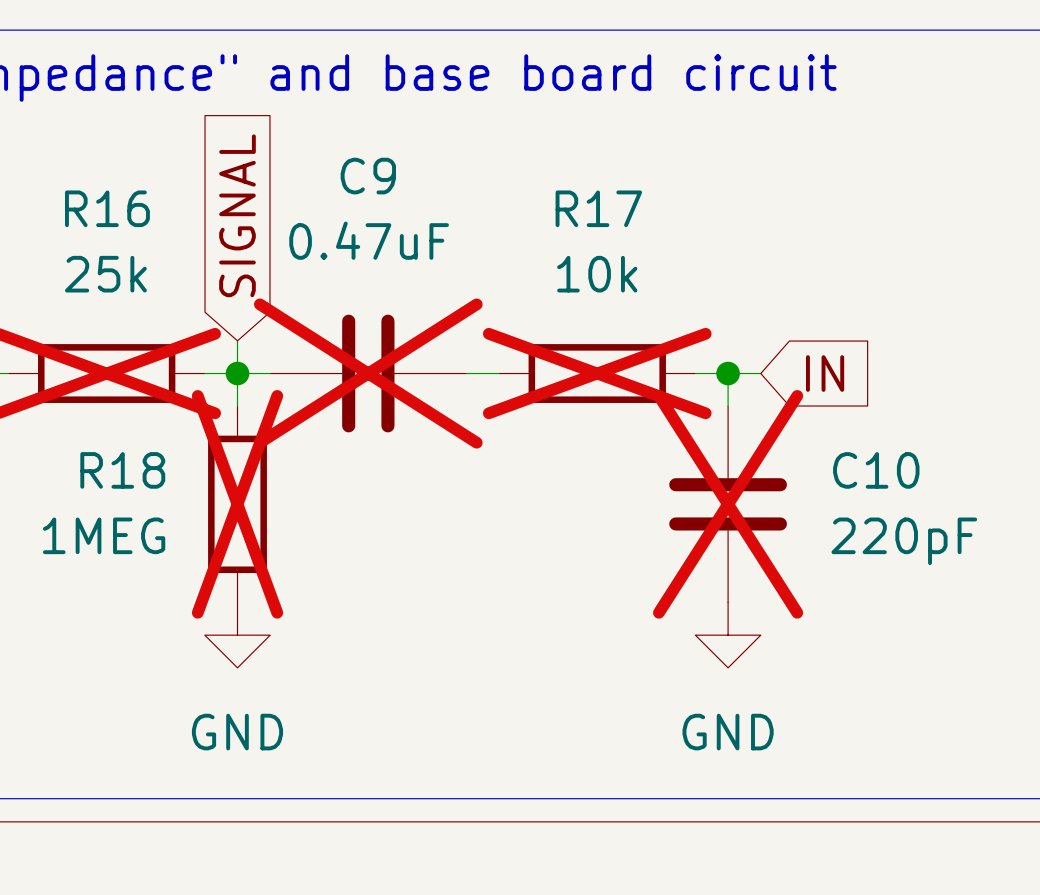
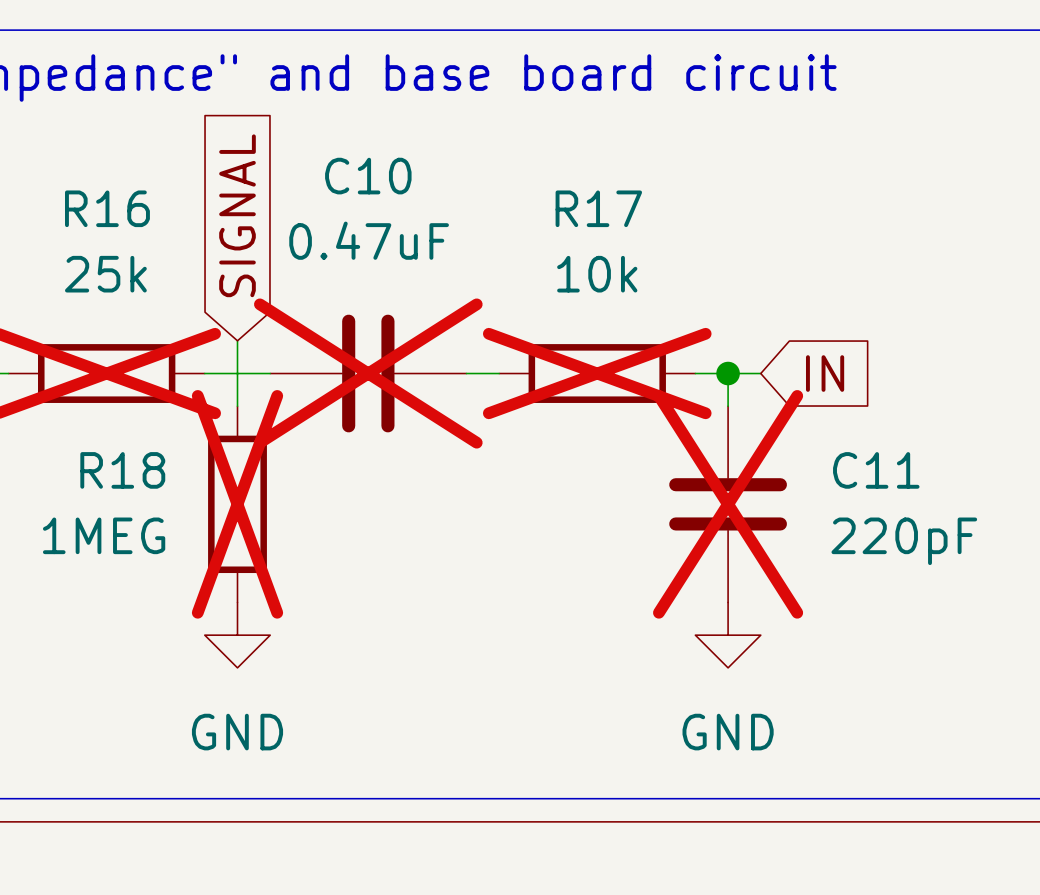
C9 name: C9 (368, 176) -> C10 (368, 176)
junction: (237, 373) -> none
C10 name: C10 (876, 470) -> C11 (876, 470)

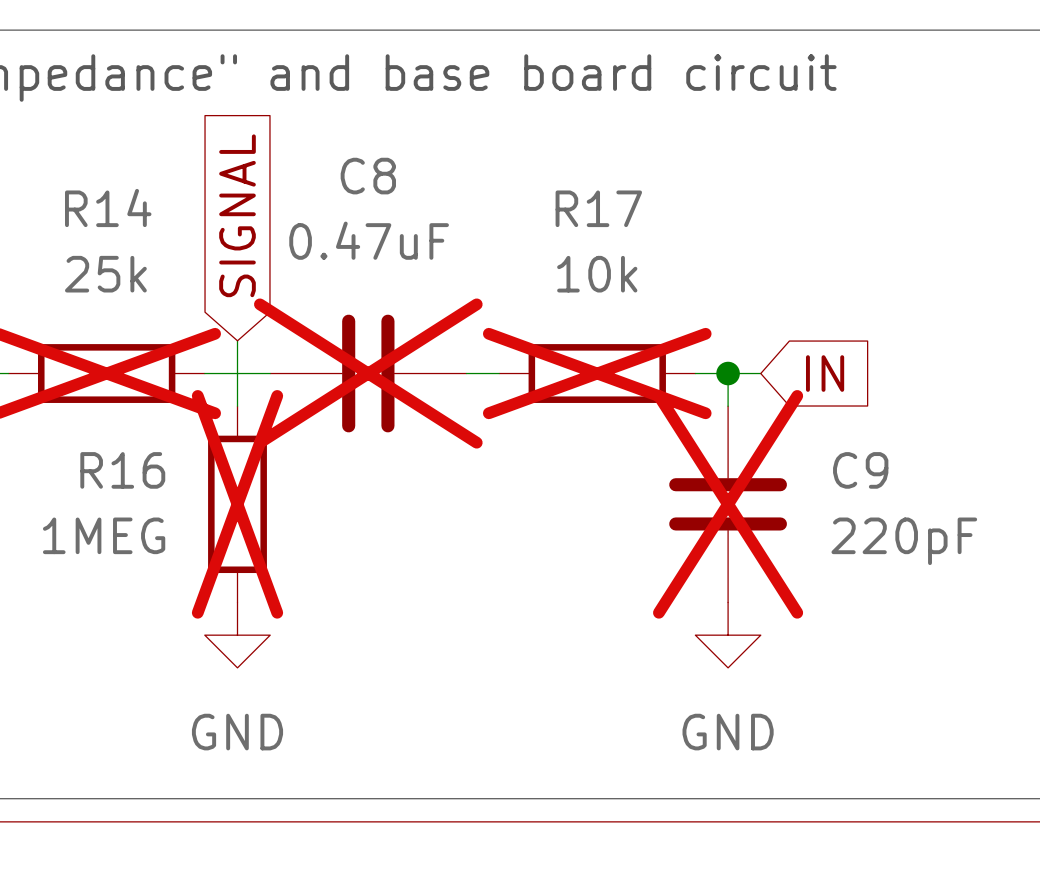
C10 name: C10 (368, 176) -> C8 (368, 176)
R16 name: R16 (107, 208) -> R14 (108, 208)
R18 name: R18 (122, 470) -> R16 (122, 470)
C11 name: C11 (876, 470) -> C9 (860, 470)

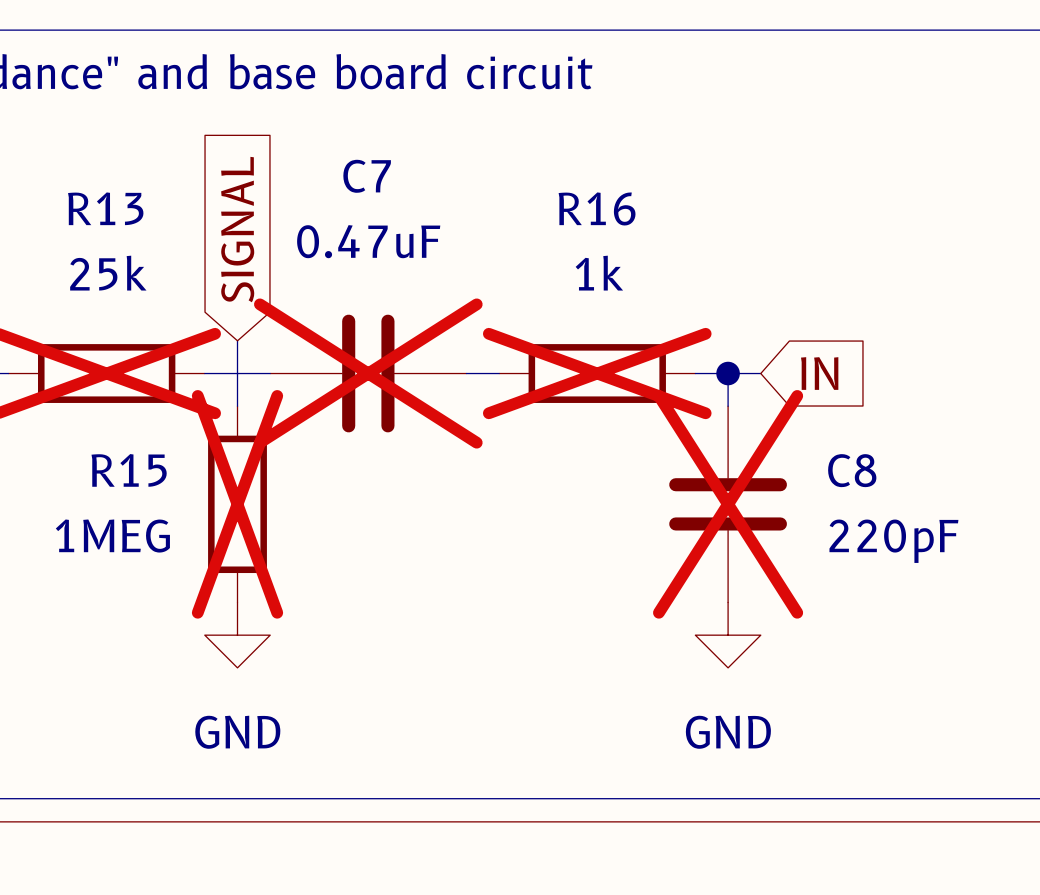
C8 name: C8 (368, 176) -> C7 (367, 176)
R14 name: R14 (108, 208) -> R13 (105, 208)
R17 name: R17 (598, 208) -> R16 (597, 208)
R17 value: 10k (597, 274) -> 1k (599, 273)
R16 name: R16 (122, 470) -> R15 (129, 470)
C9 name: C9 (860, 470) -> C8 (852, 470)

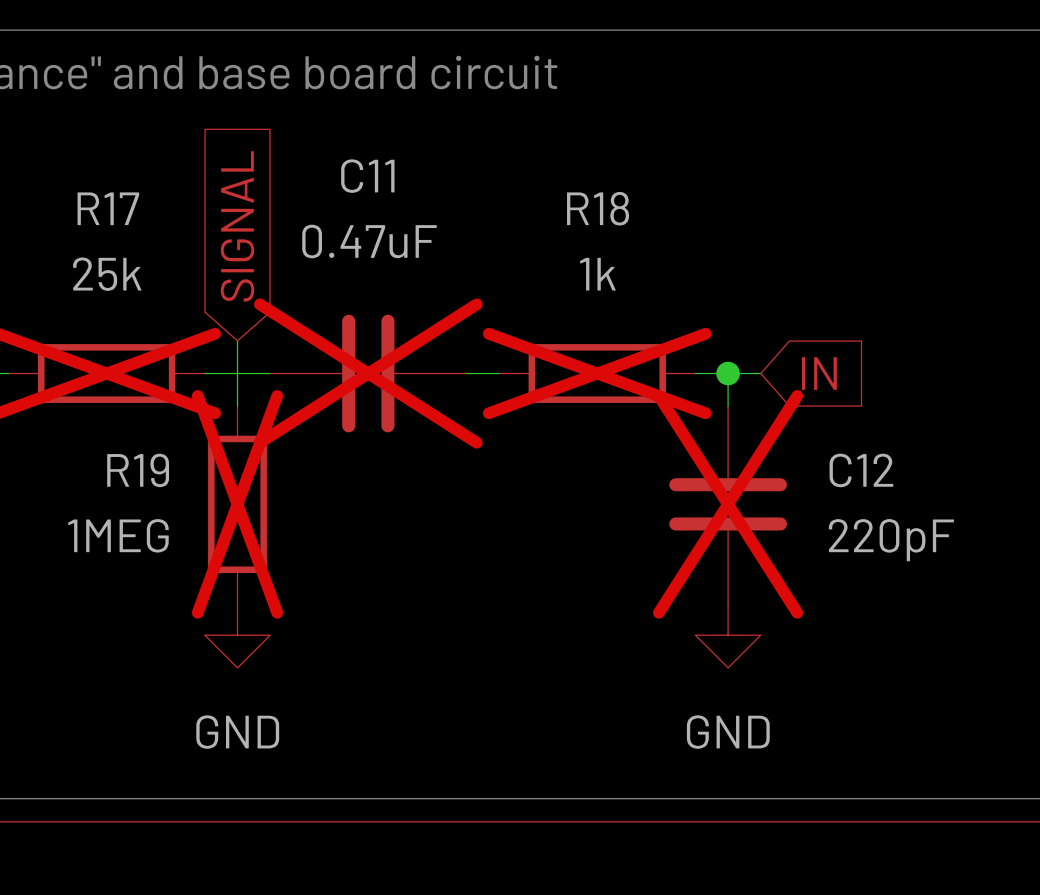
C7 name: C7 (367, 176) -> C11 (367, 176)
R13 name: R13 (105, 208) -> R17 (108, 208)
R16 name: R16 (597, 208) -> R18 (598, 208)
R15 name: R15 (129, 470) -> R19 (138, 470)
C8 name: C8 (852, 470) -> C12 (861, 470)

